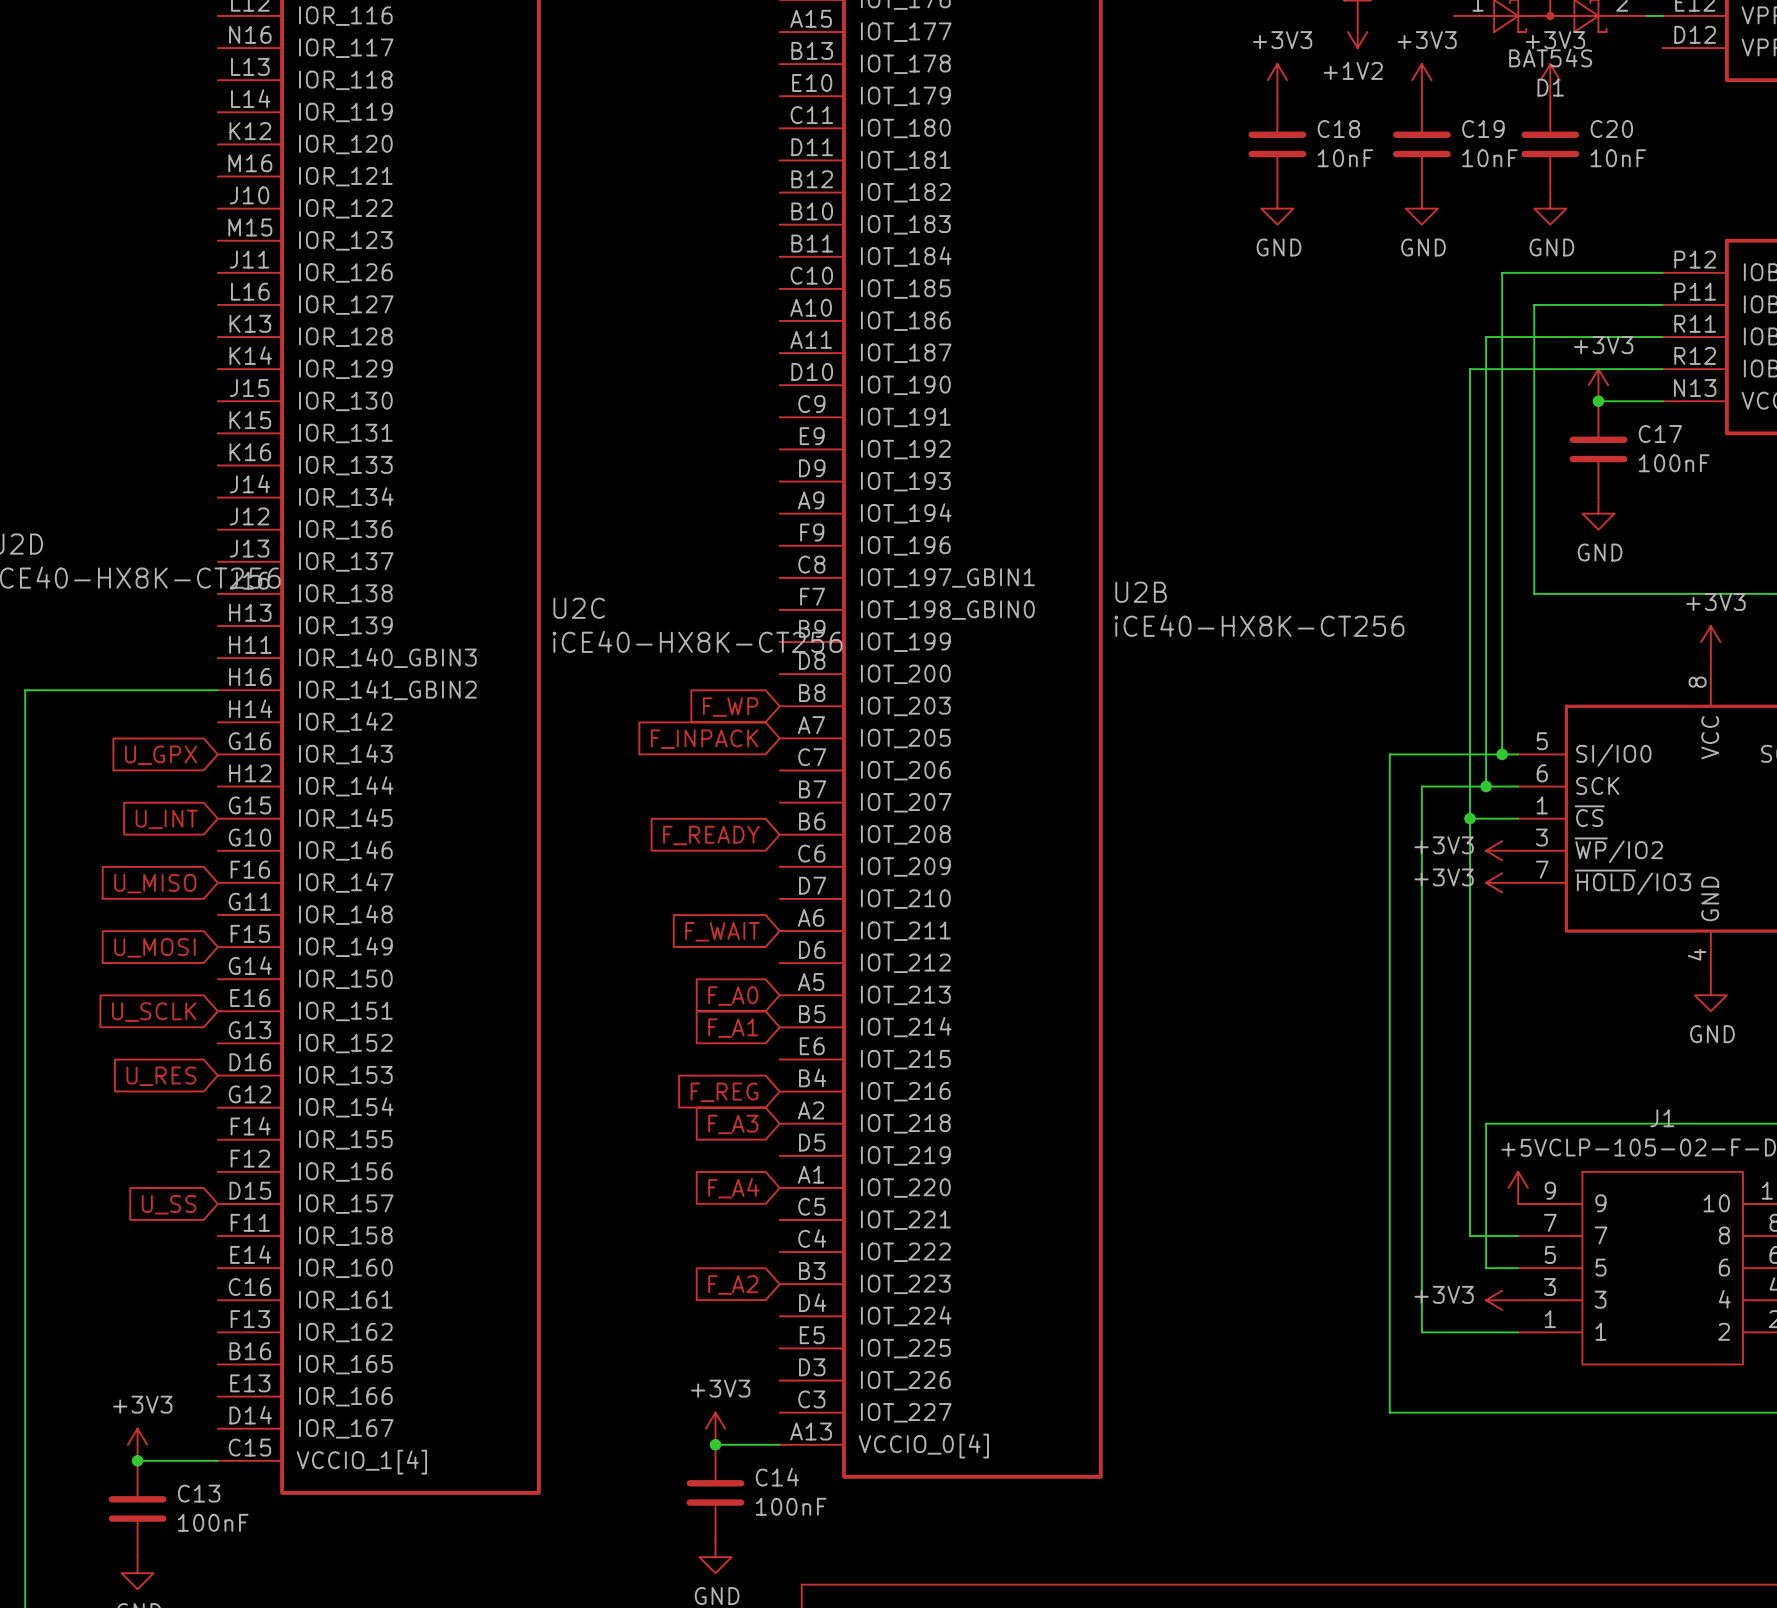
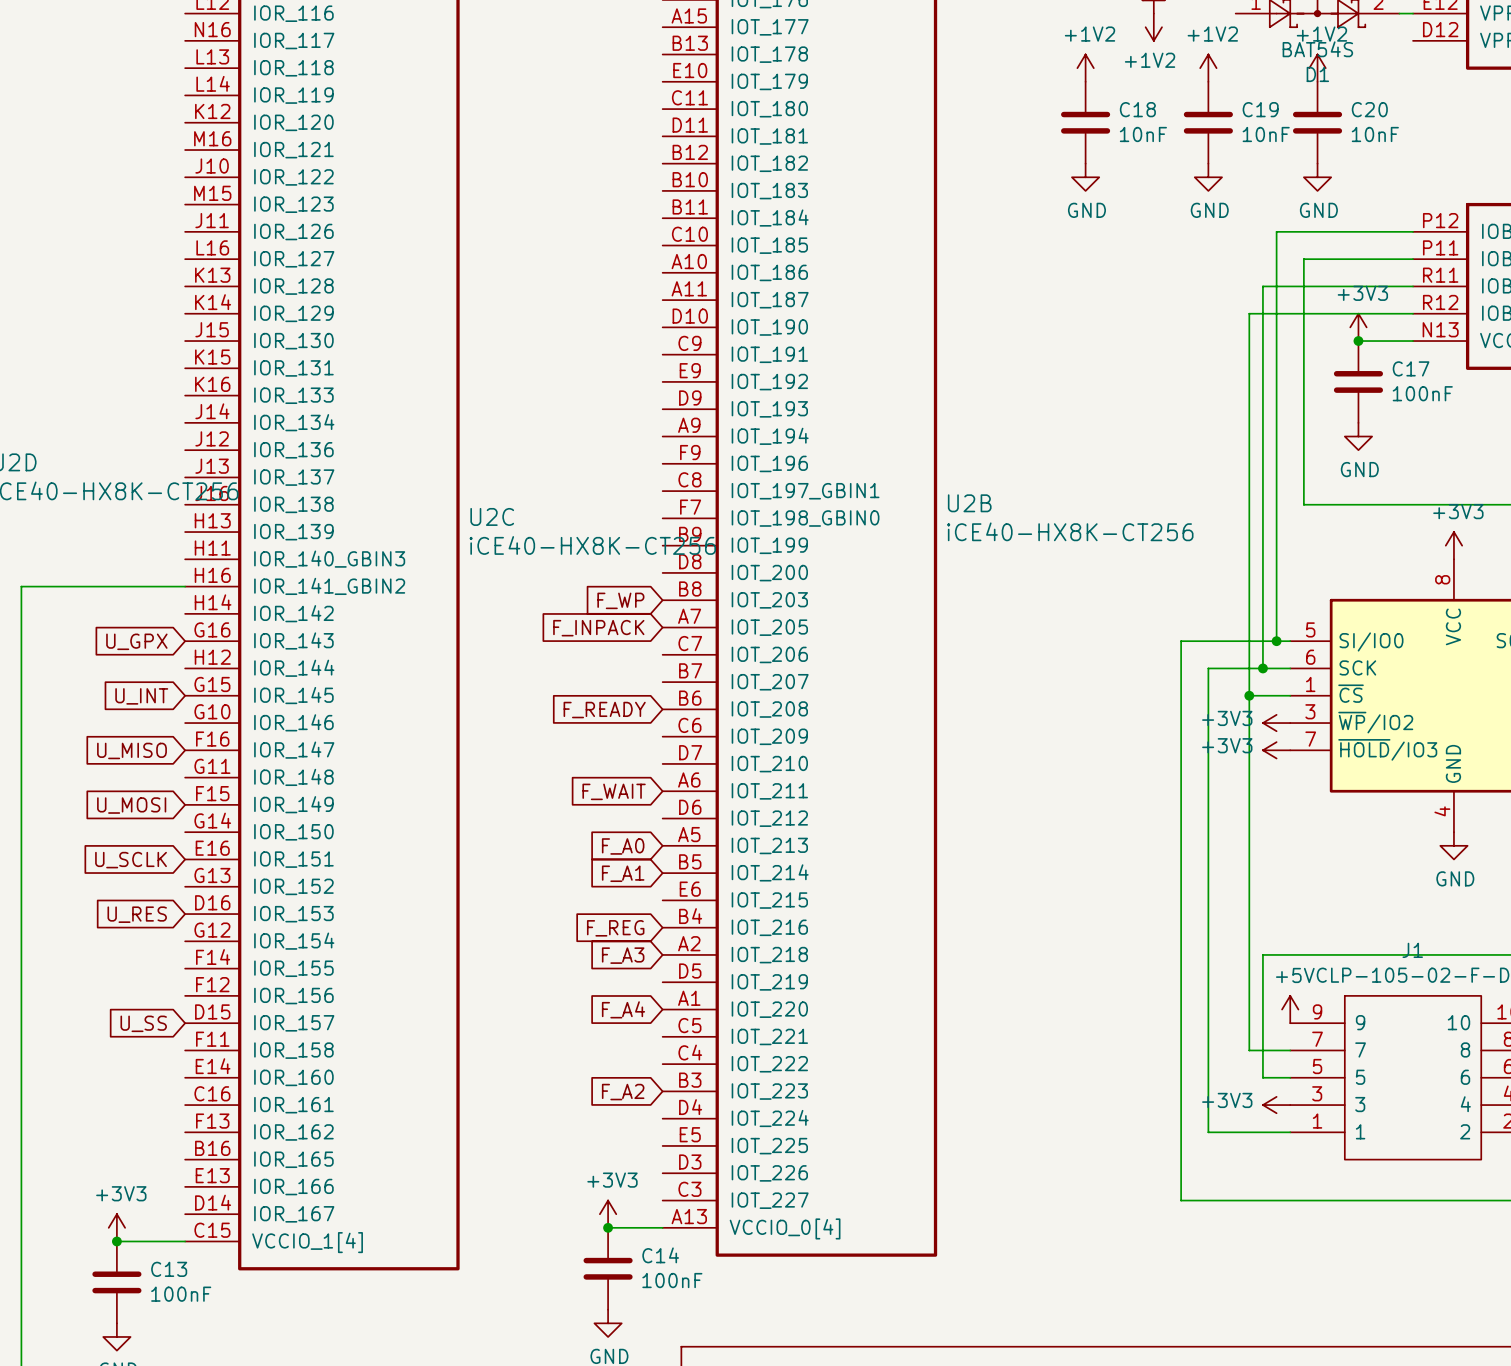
power symbol: +3V3 (1277, 80) -> +1V2 (1085, 68)
power symbol: +3V3 (1421, 80) -> +1V2 (1208, 68)
power symbol: +3V3 (1550, 80) -> +1V2 (1317, 68)

